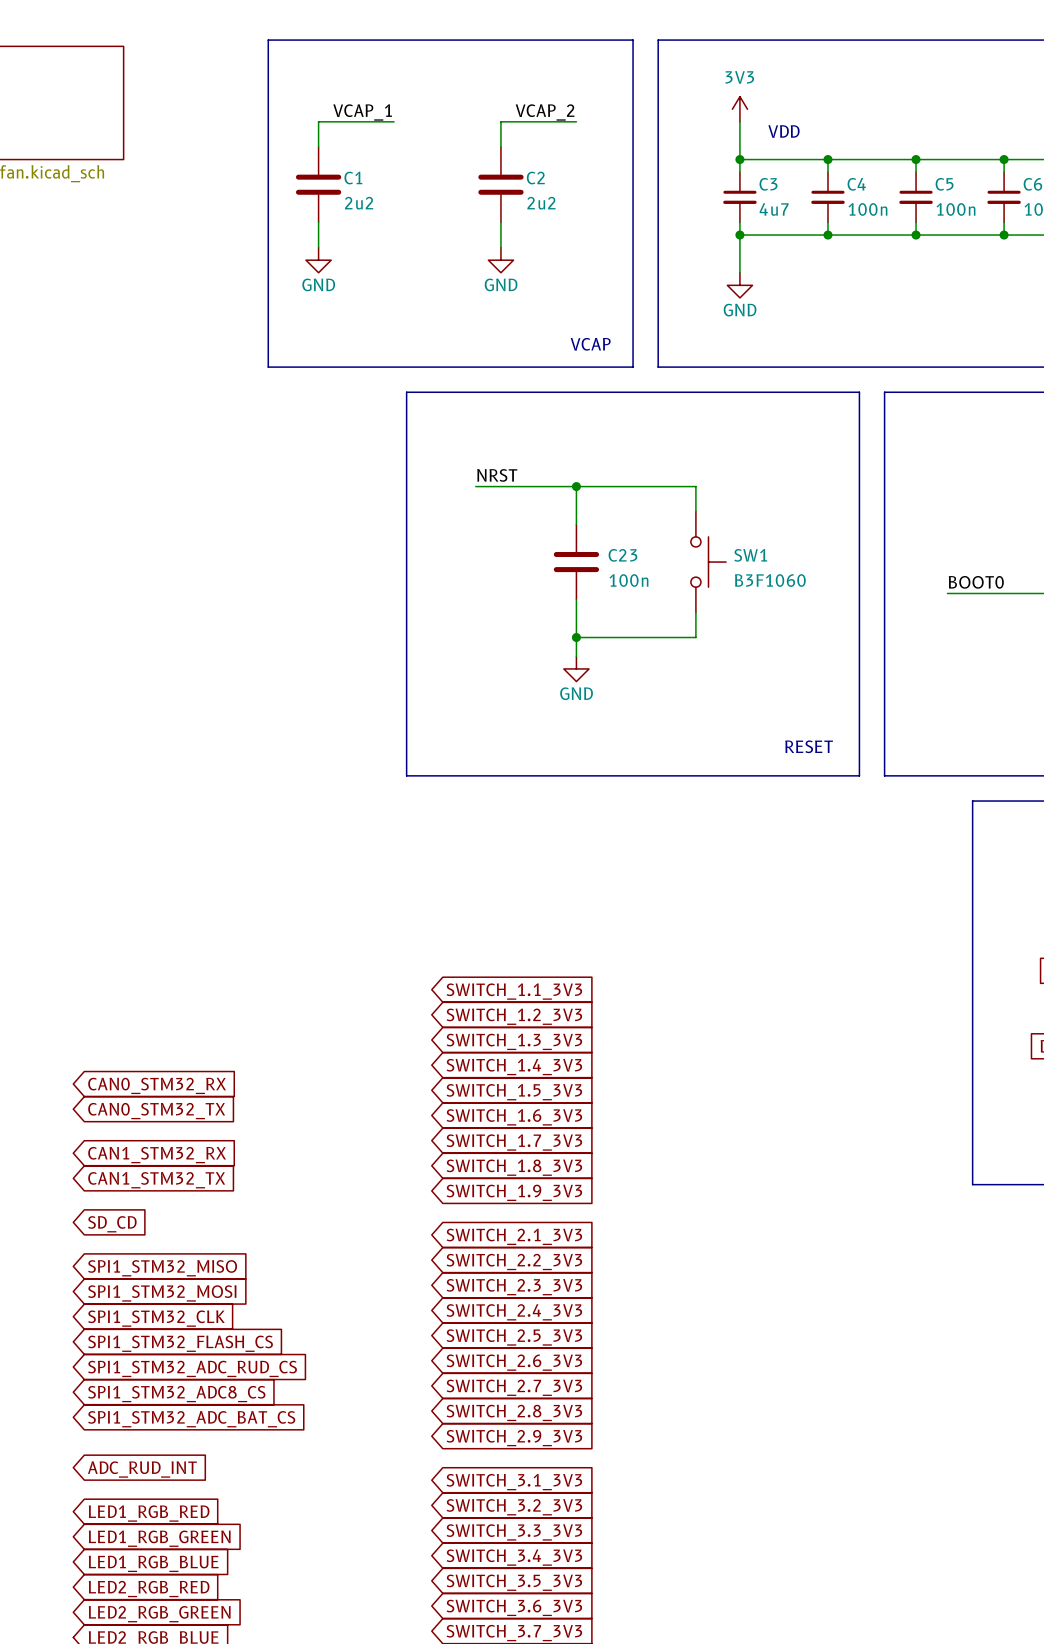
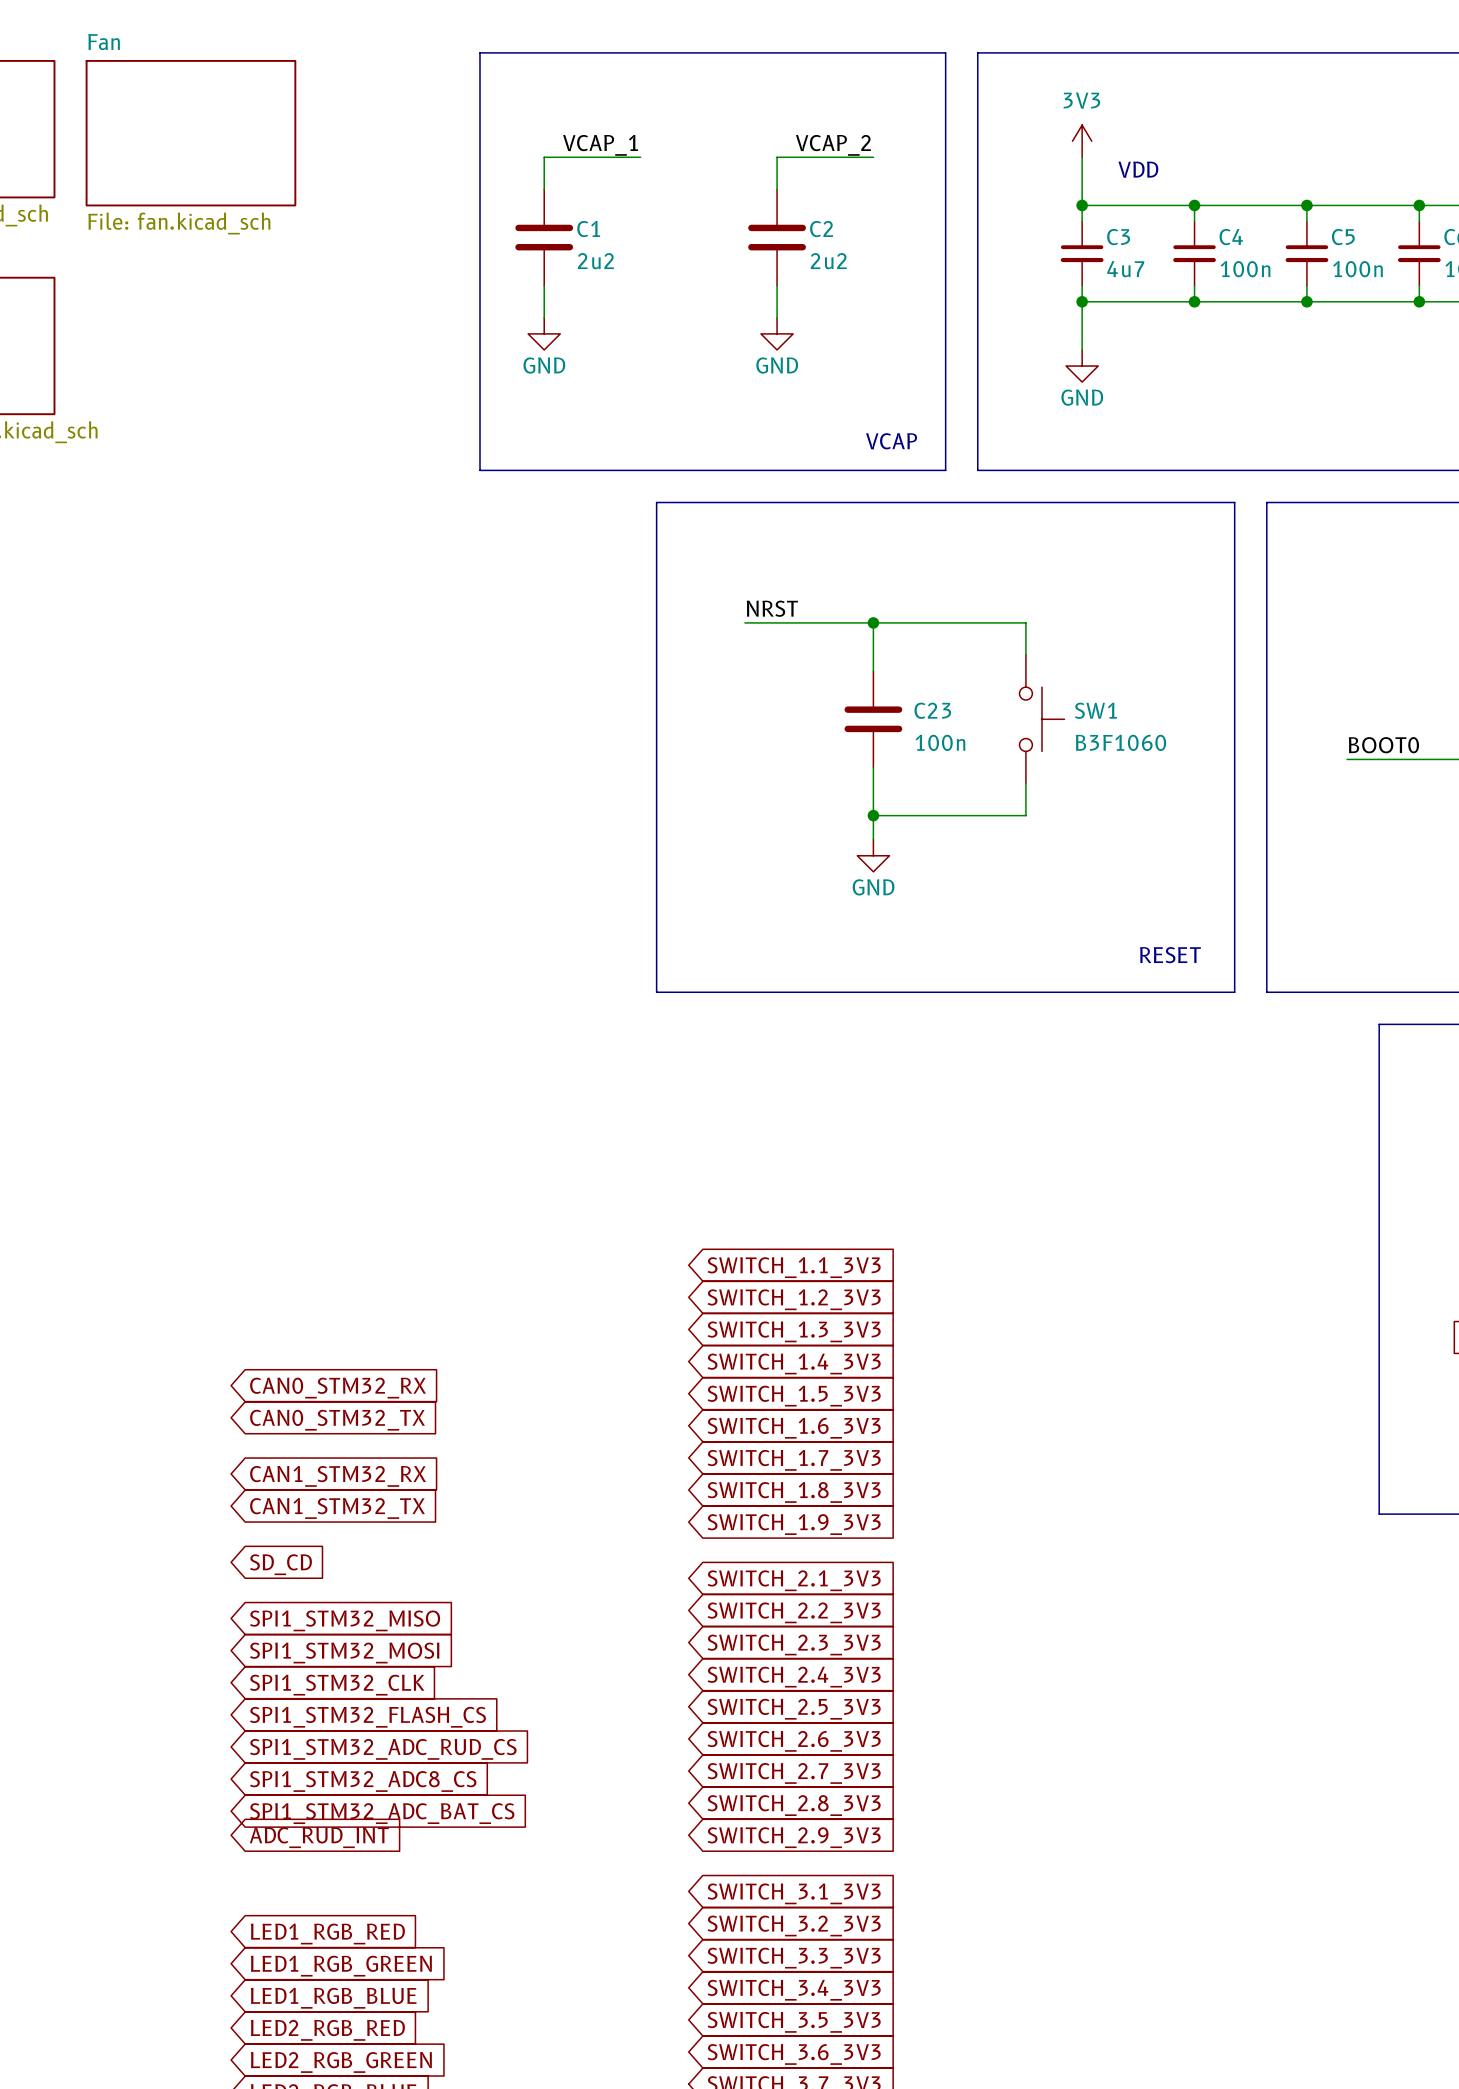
global label position: ADC_RUD_INT (142, 1469) -> ADC_RUD_INT (319, 1837)

